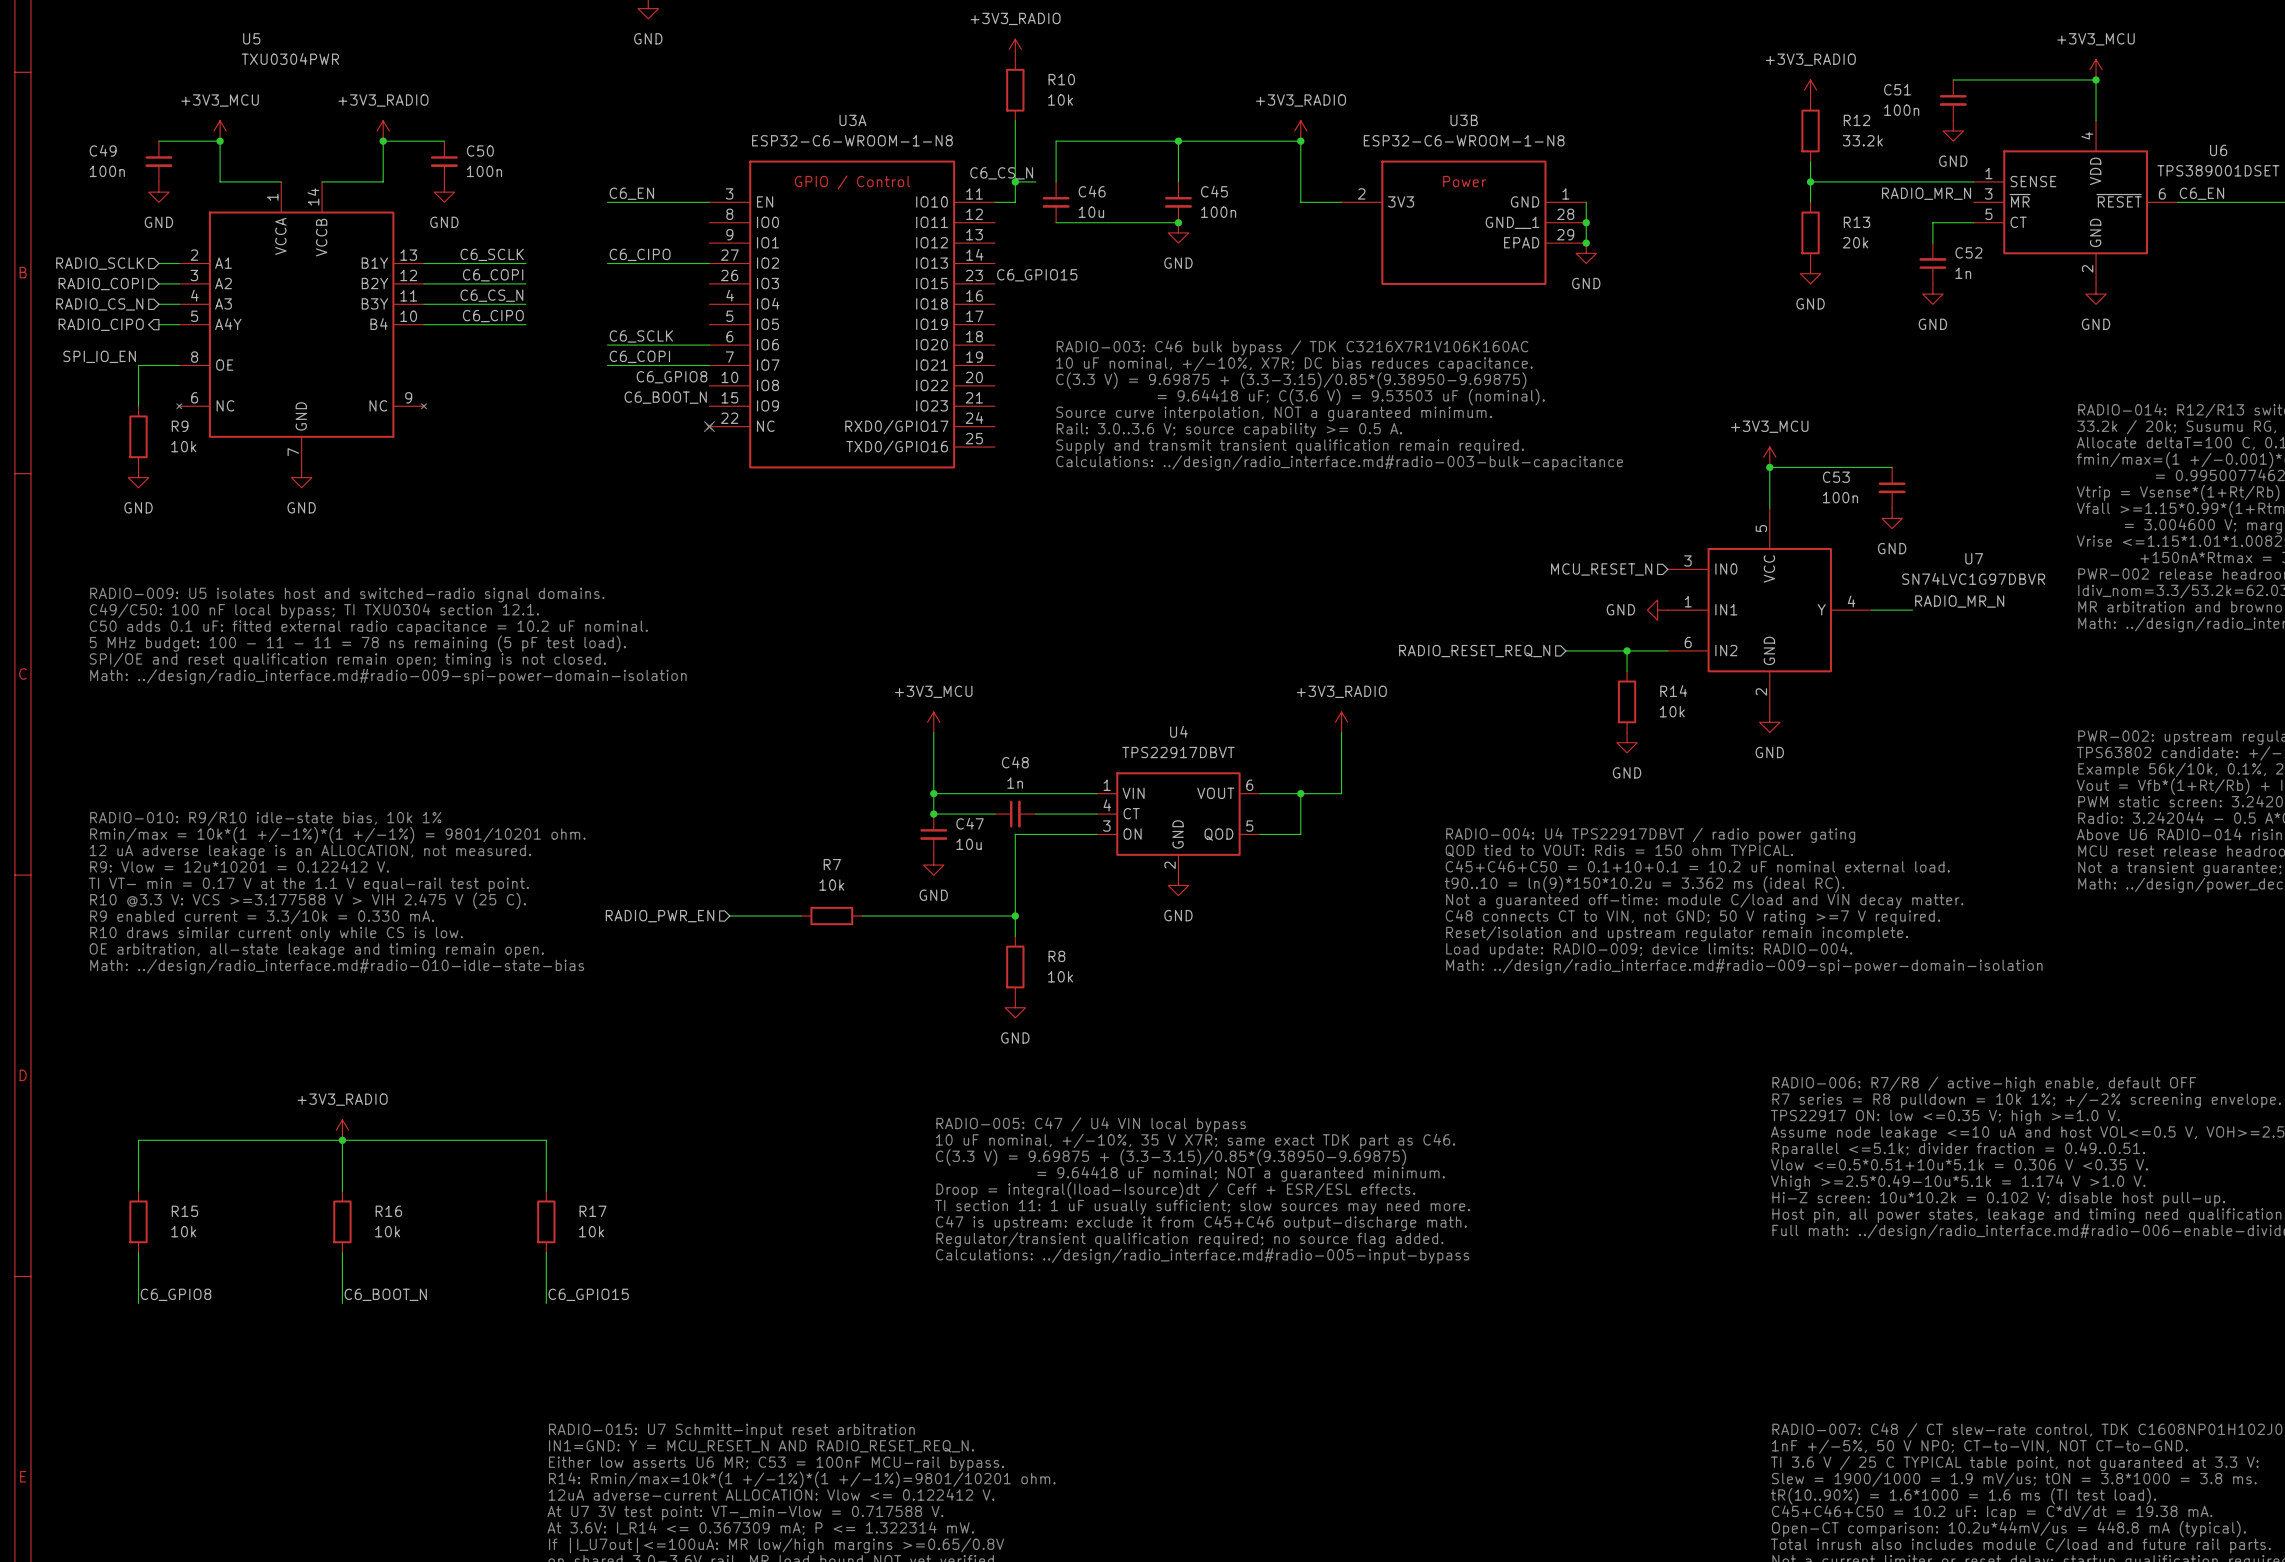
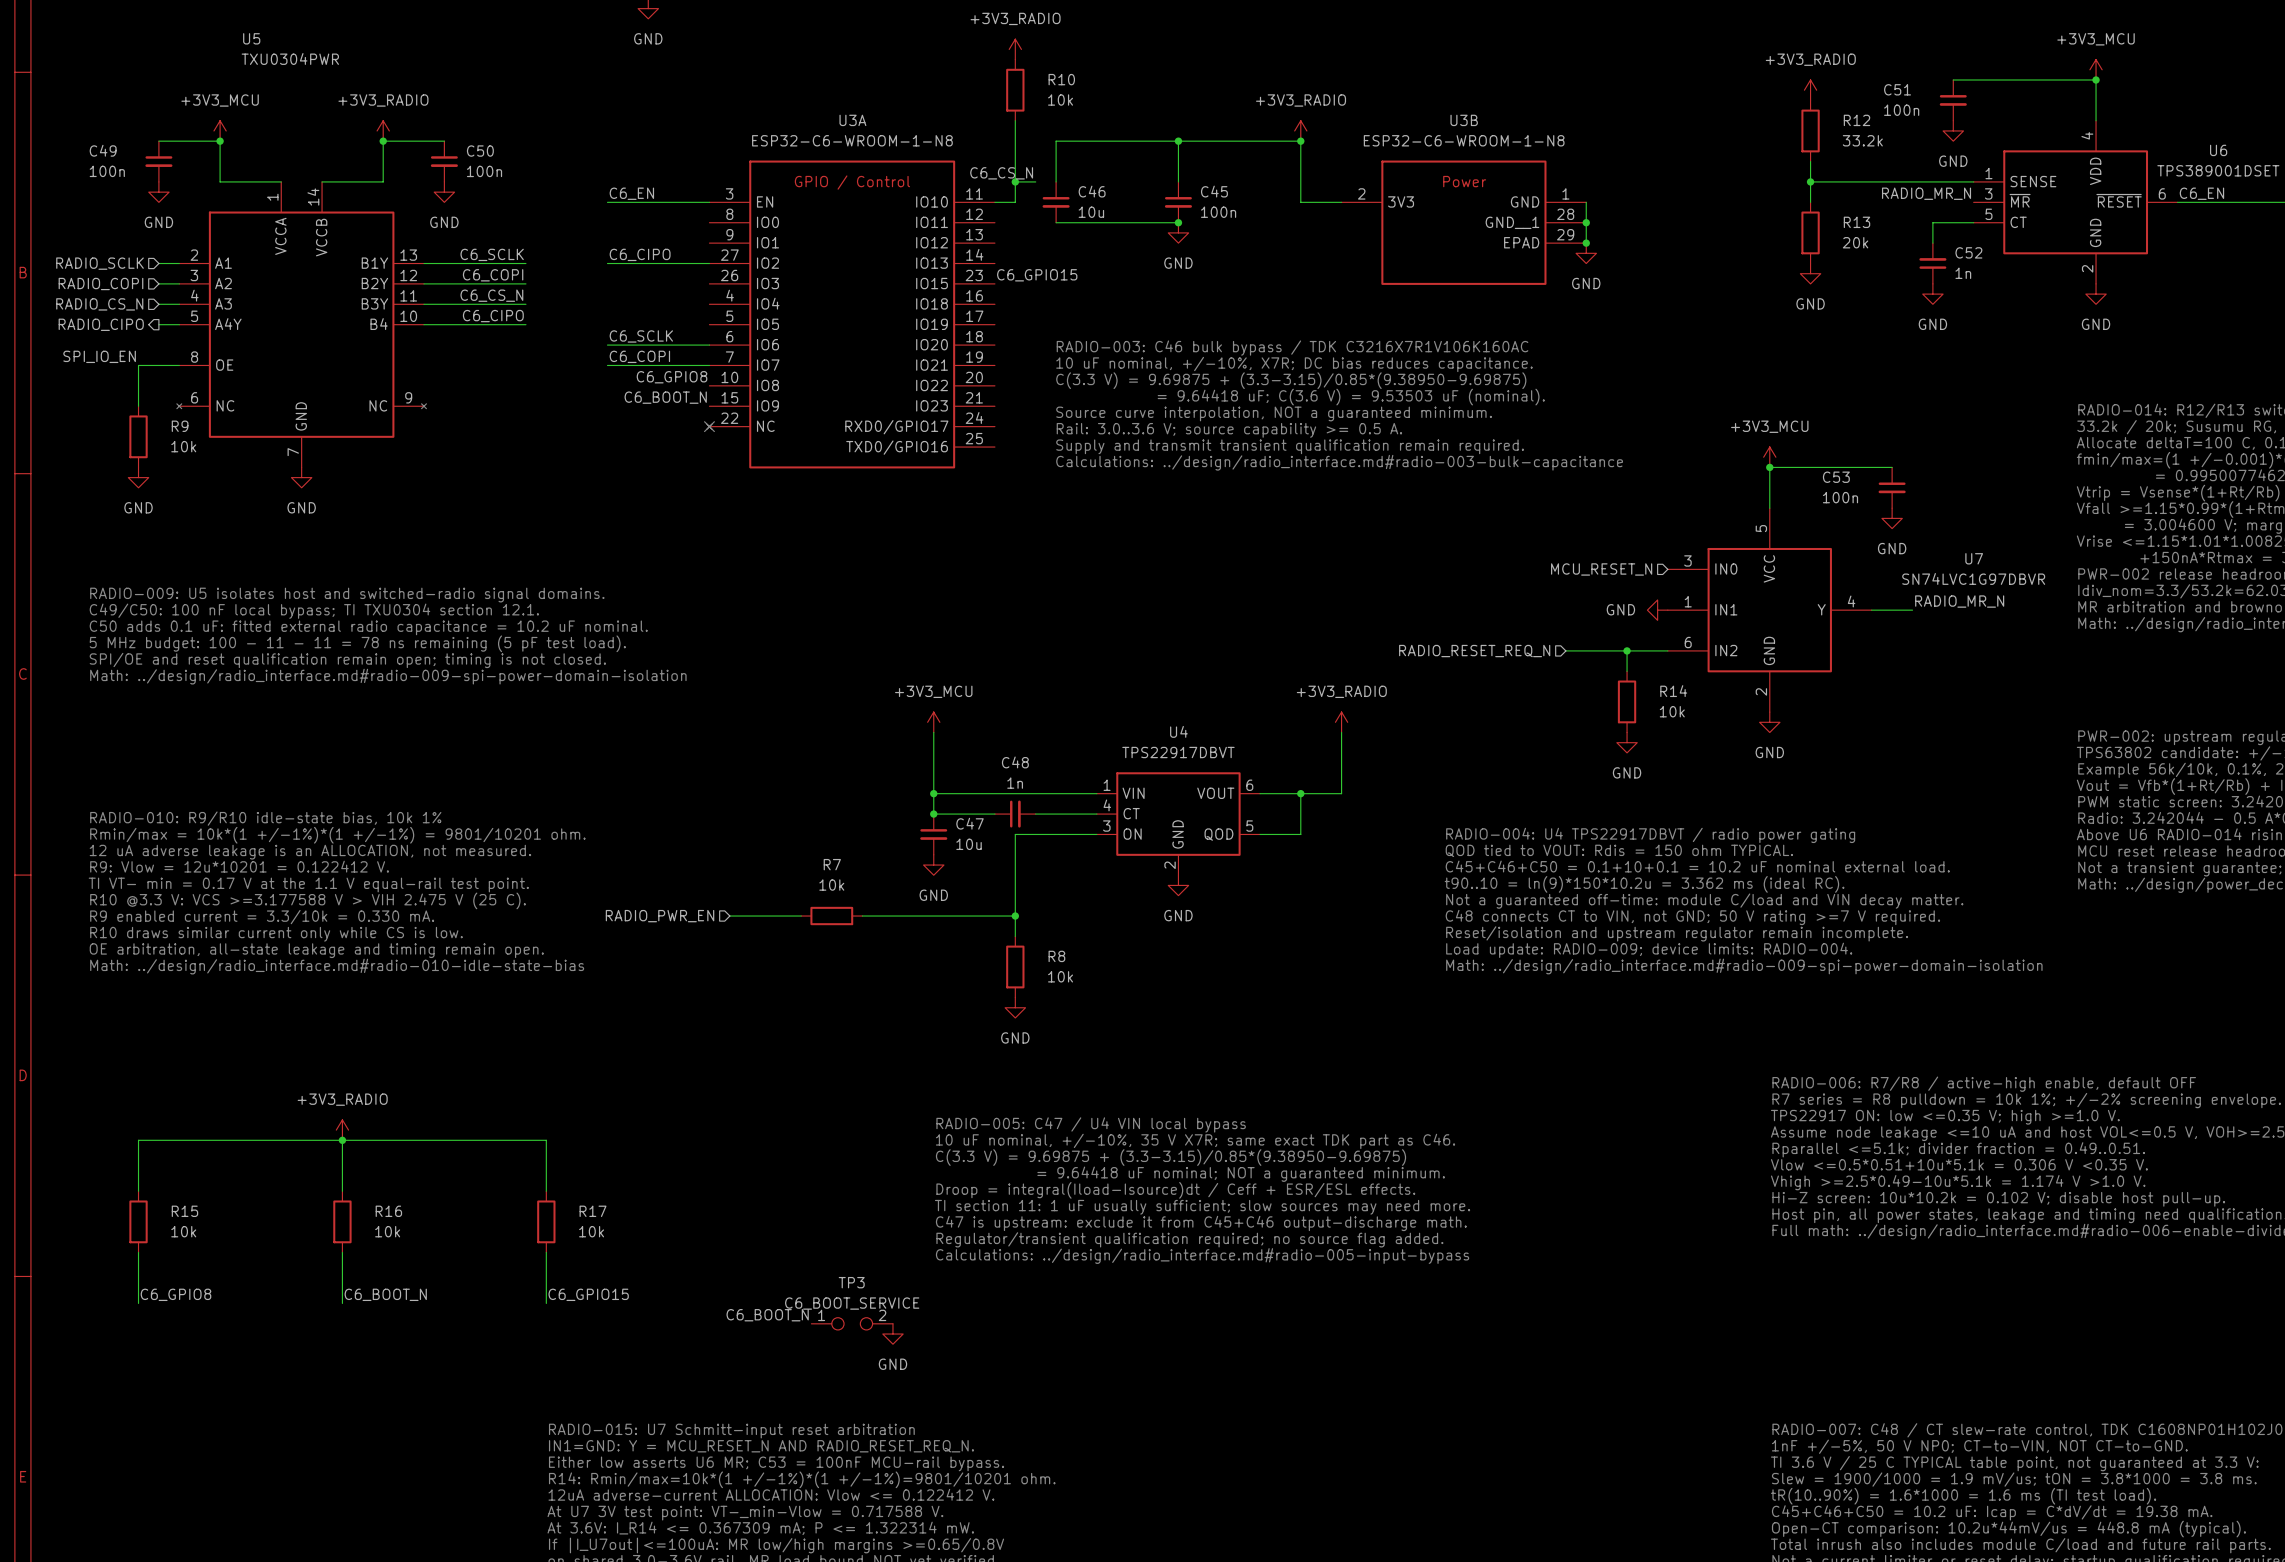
label: none -> C6_BOOT_N (767, 1315)
TP3: none -> C6_BOOT_SERVICE (852, 1323)
power symbol: none -> GND (892, 1334)

